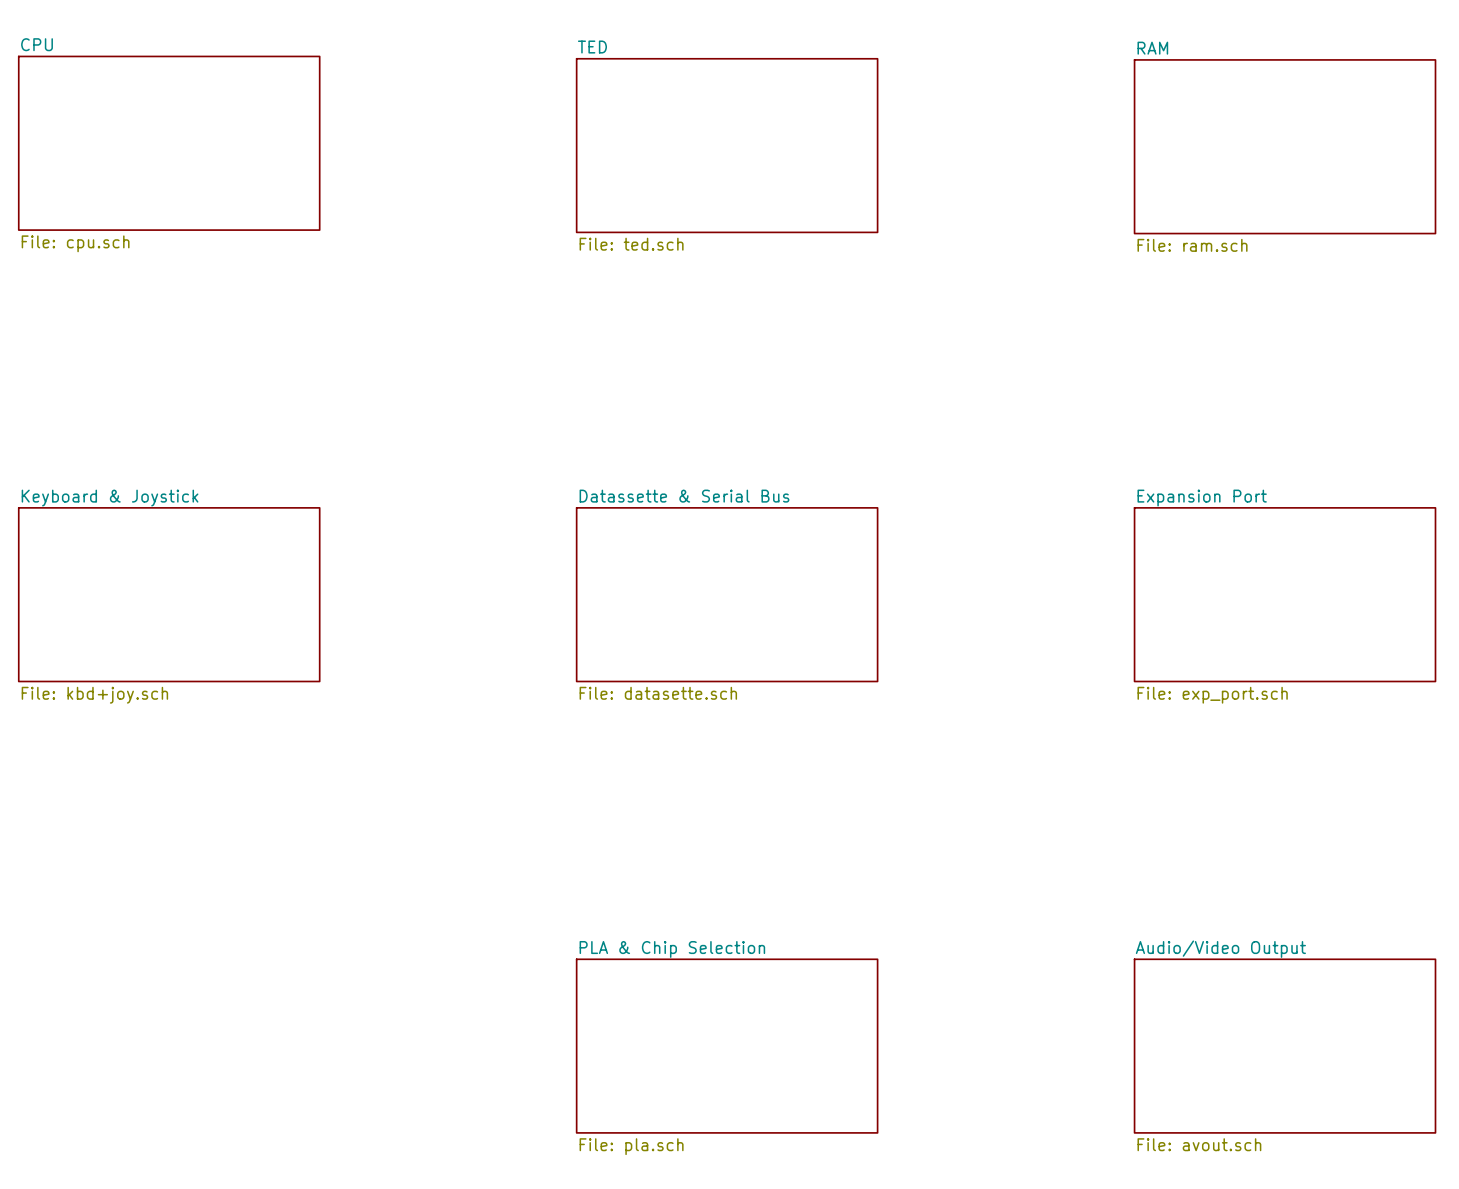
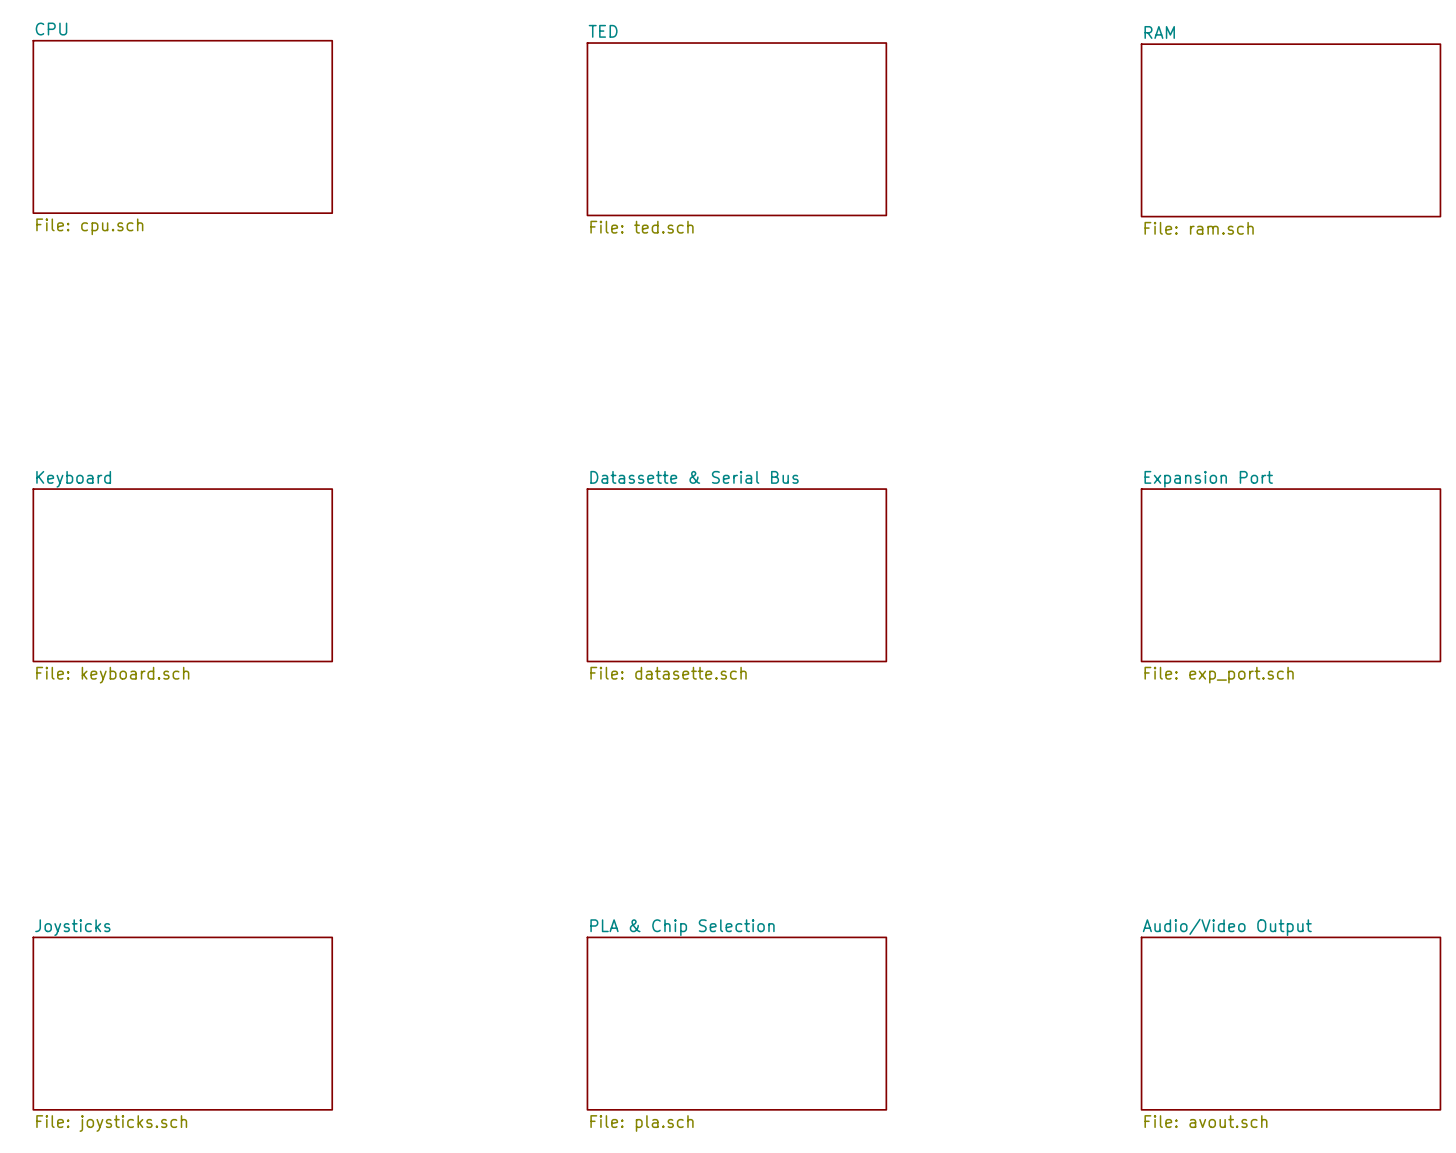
sheet Keyboard & Joystick name: Keyboard & Joystick (110, 498) -> Keyboard (73, 479)
sheet Keyboard & Joystick value: File: kbd+joy.sch (94, 695) -> File: keyboard.sch (112, 675)
sheet Joysticks: none -> File: joysticks.sch (182, 1023)

